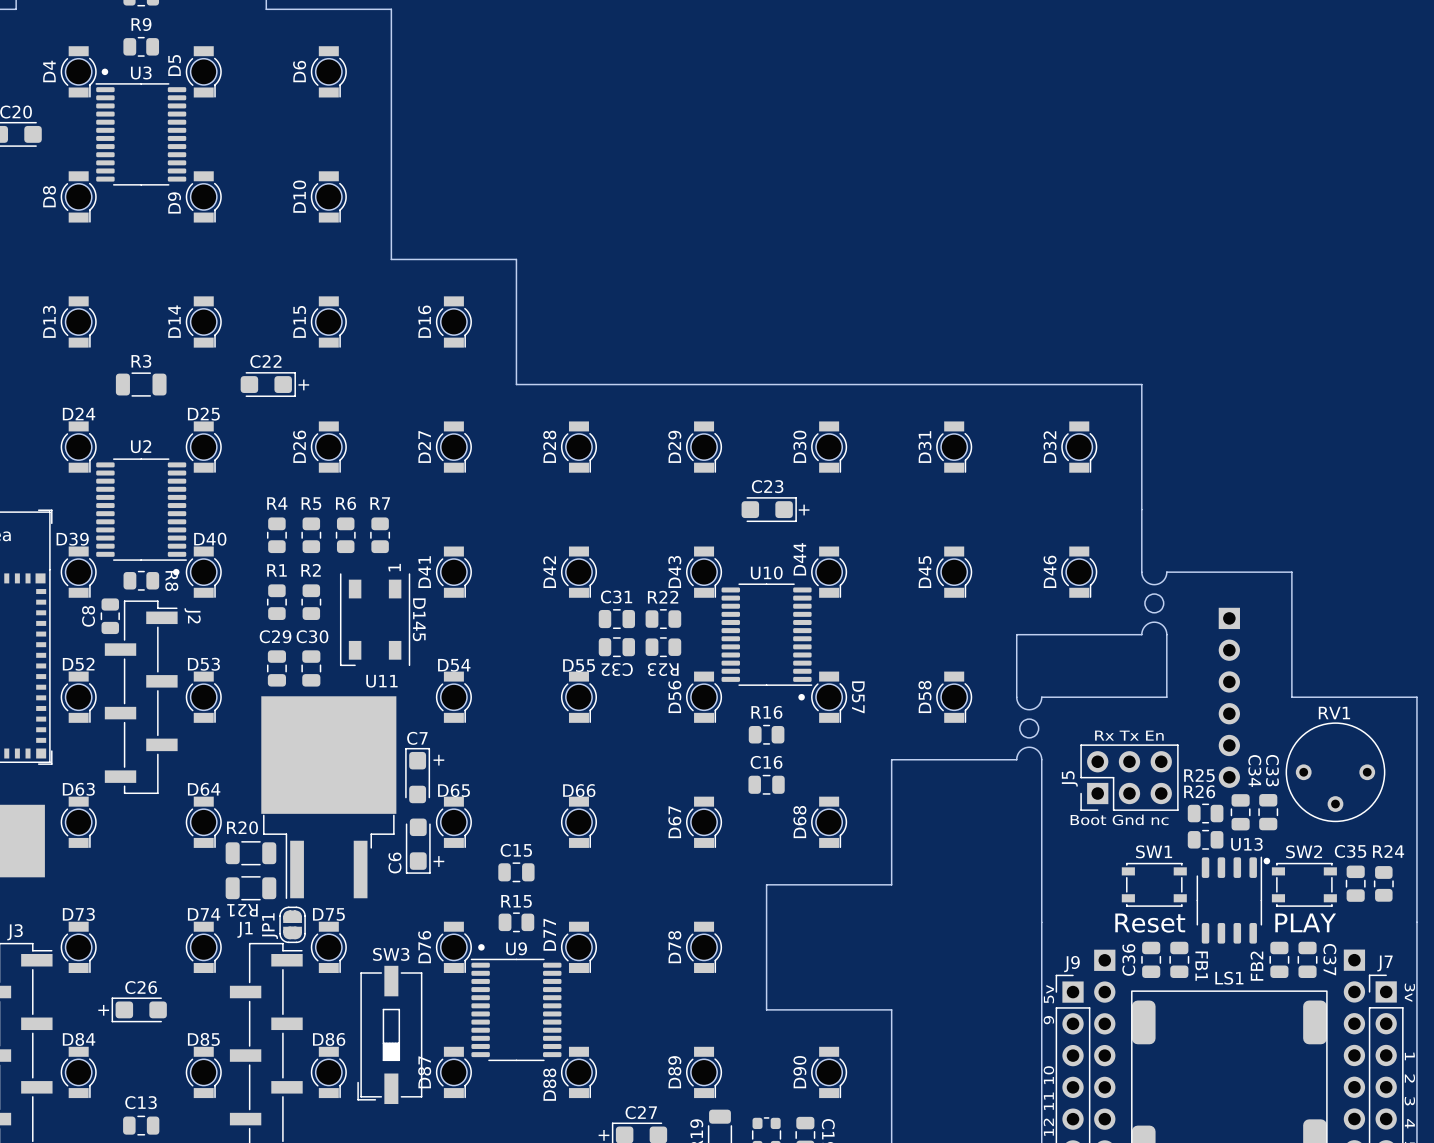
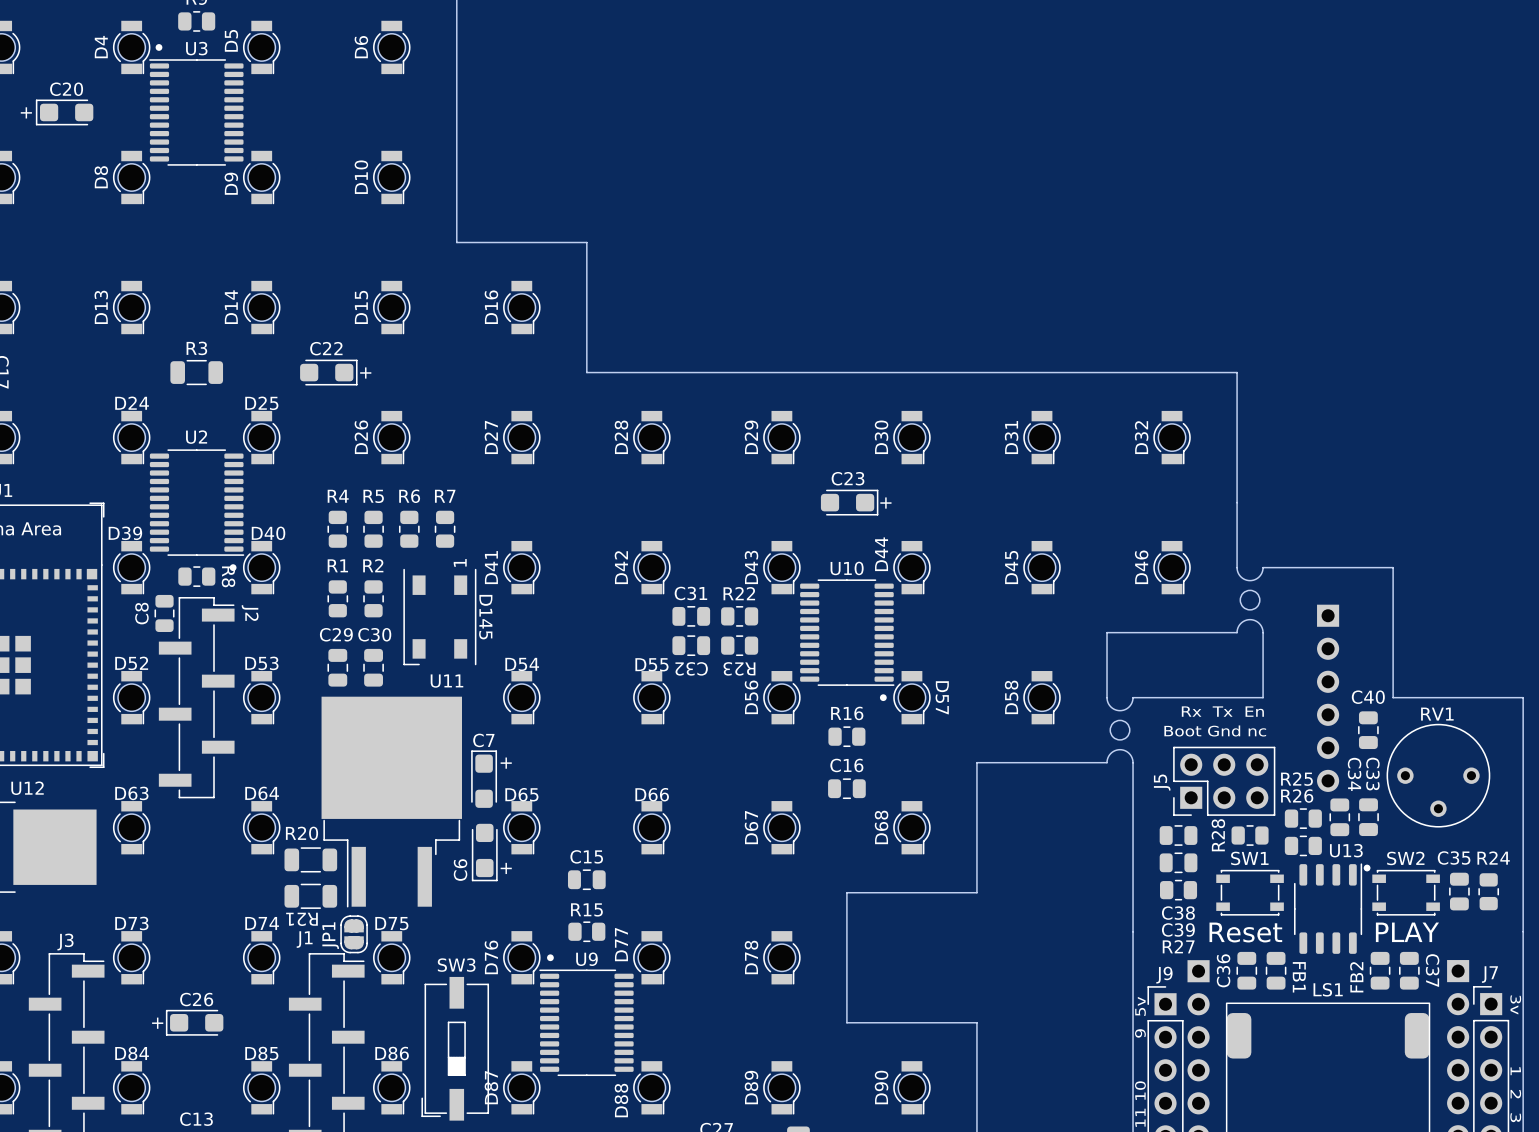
text: none -> Rx Tx En (1222, 711)
C40: none -> (1368, 730)
text: Rx Tx En (1129, 735) -> Boot Gnd nc (1215, 730)
text: Boot Gnd nc (1119, 819) -> none
C38: none -> (1178, 835)
R28: none -> (1250, 835)
C39: none -> (1178, 862)
R27: none -> (1178, 890)

